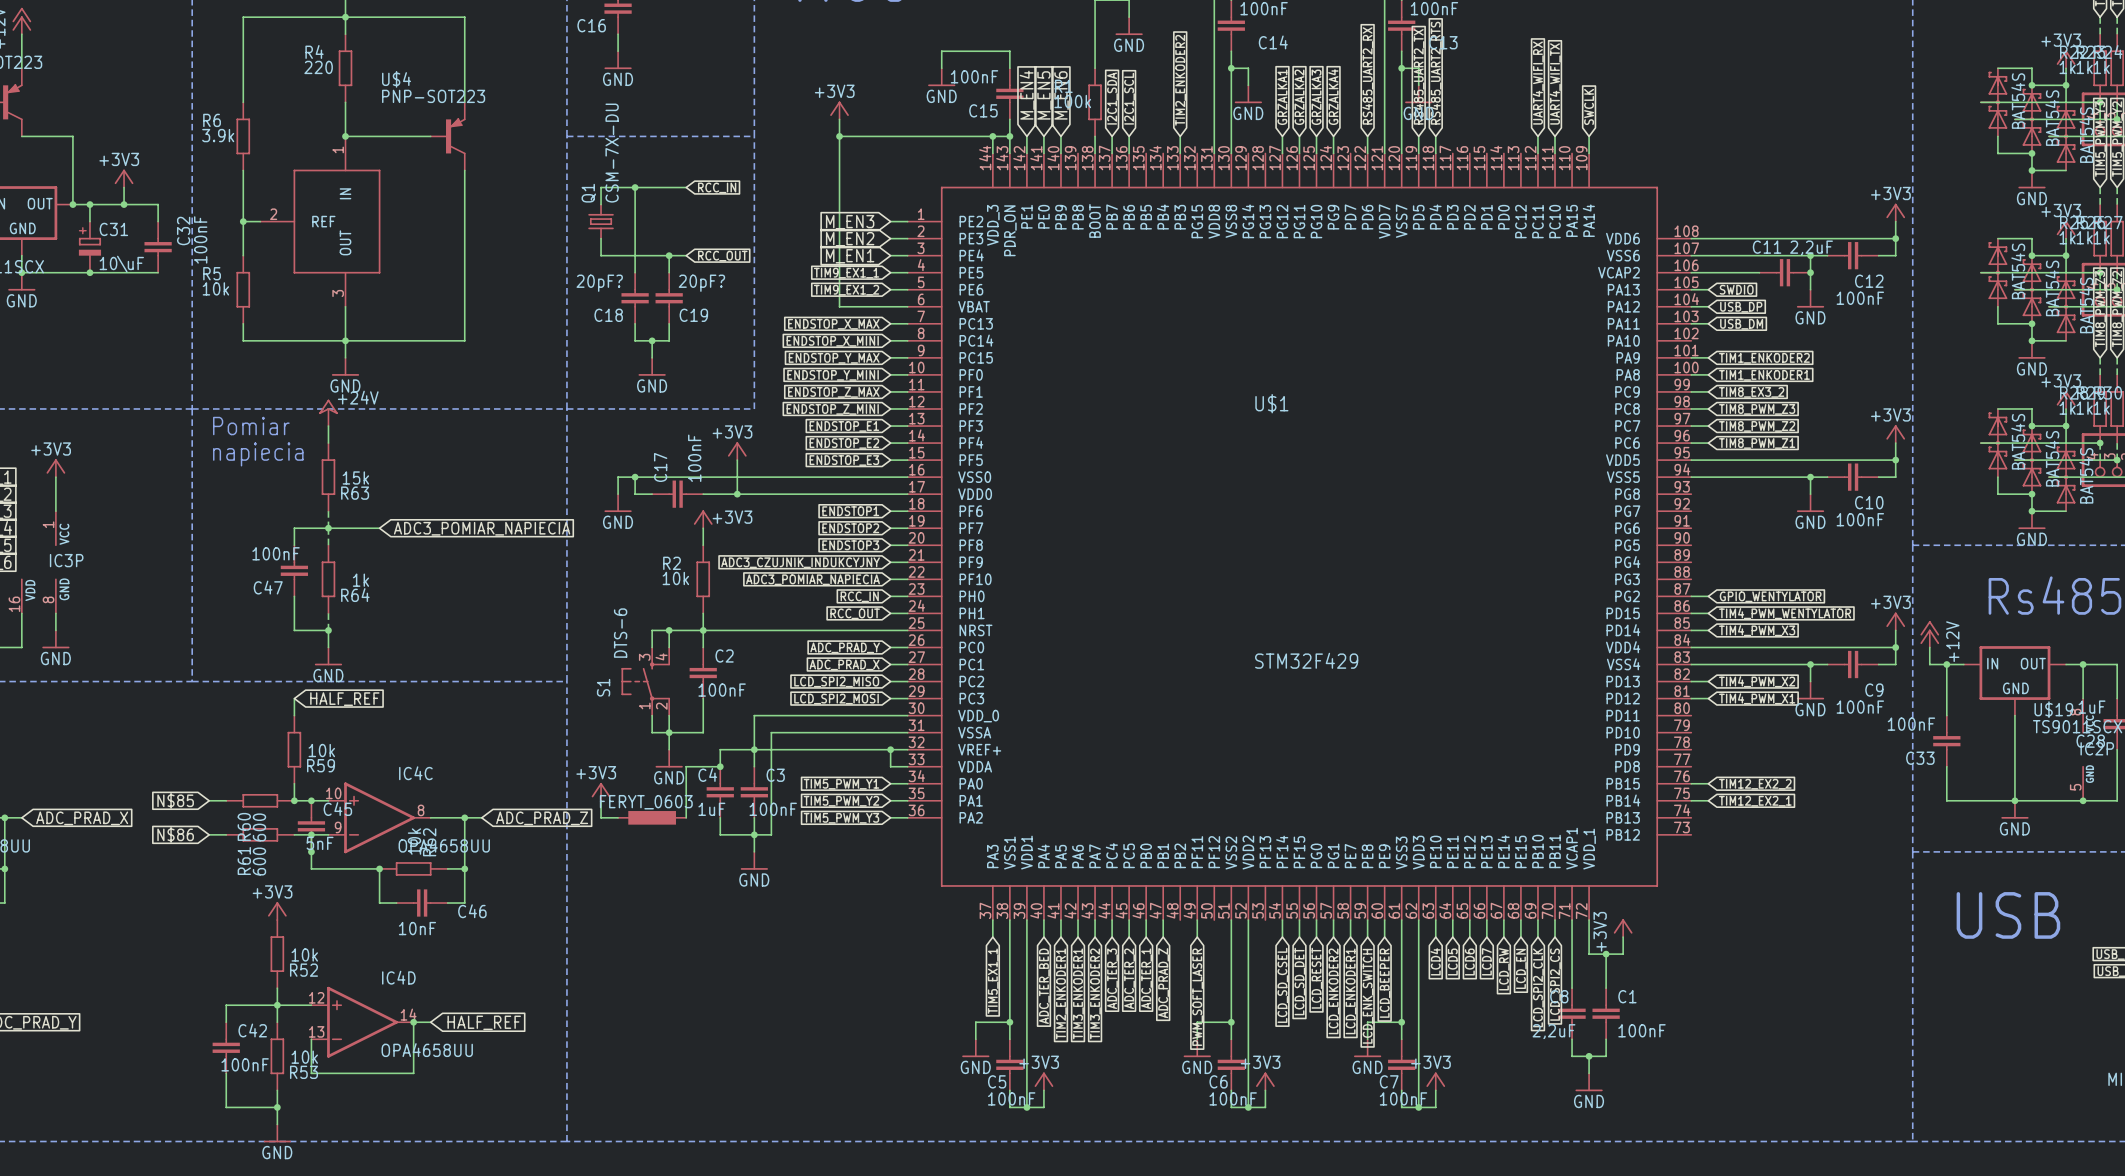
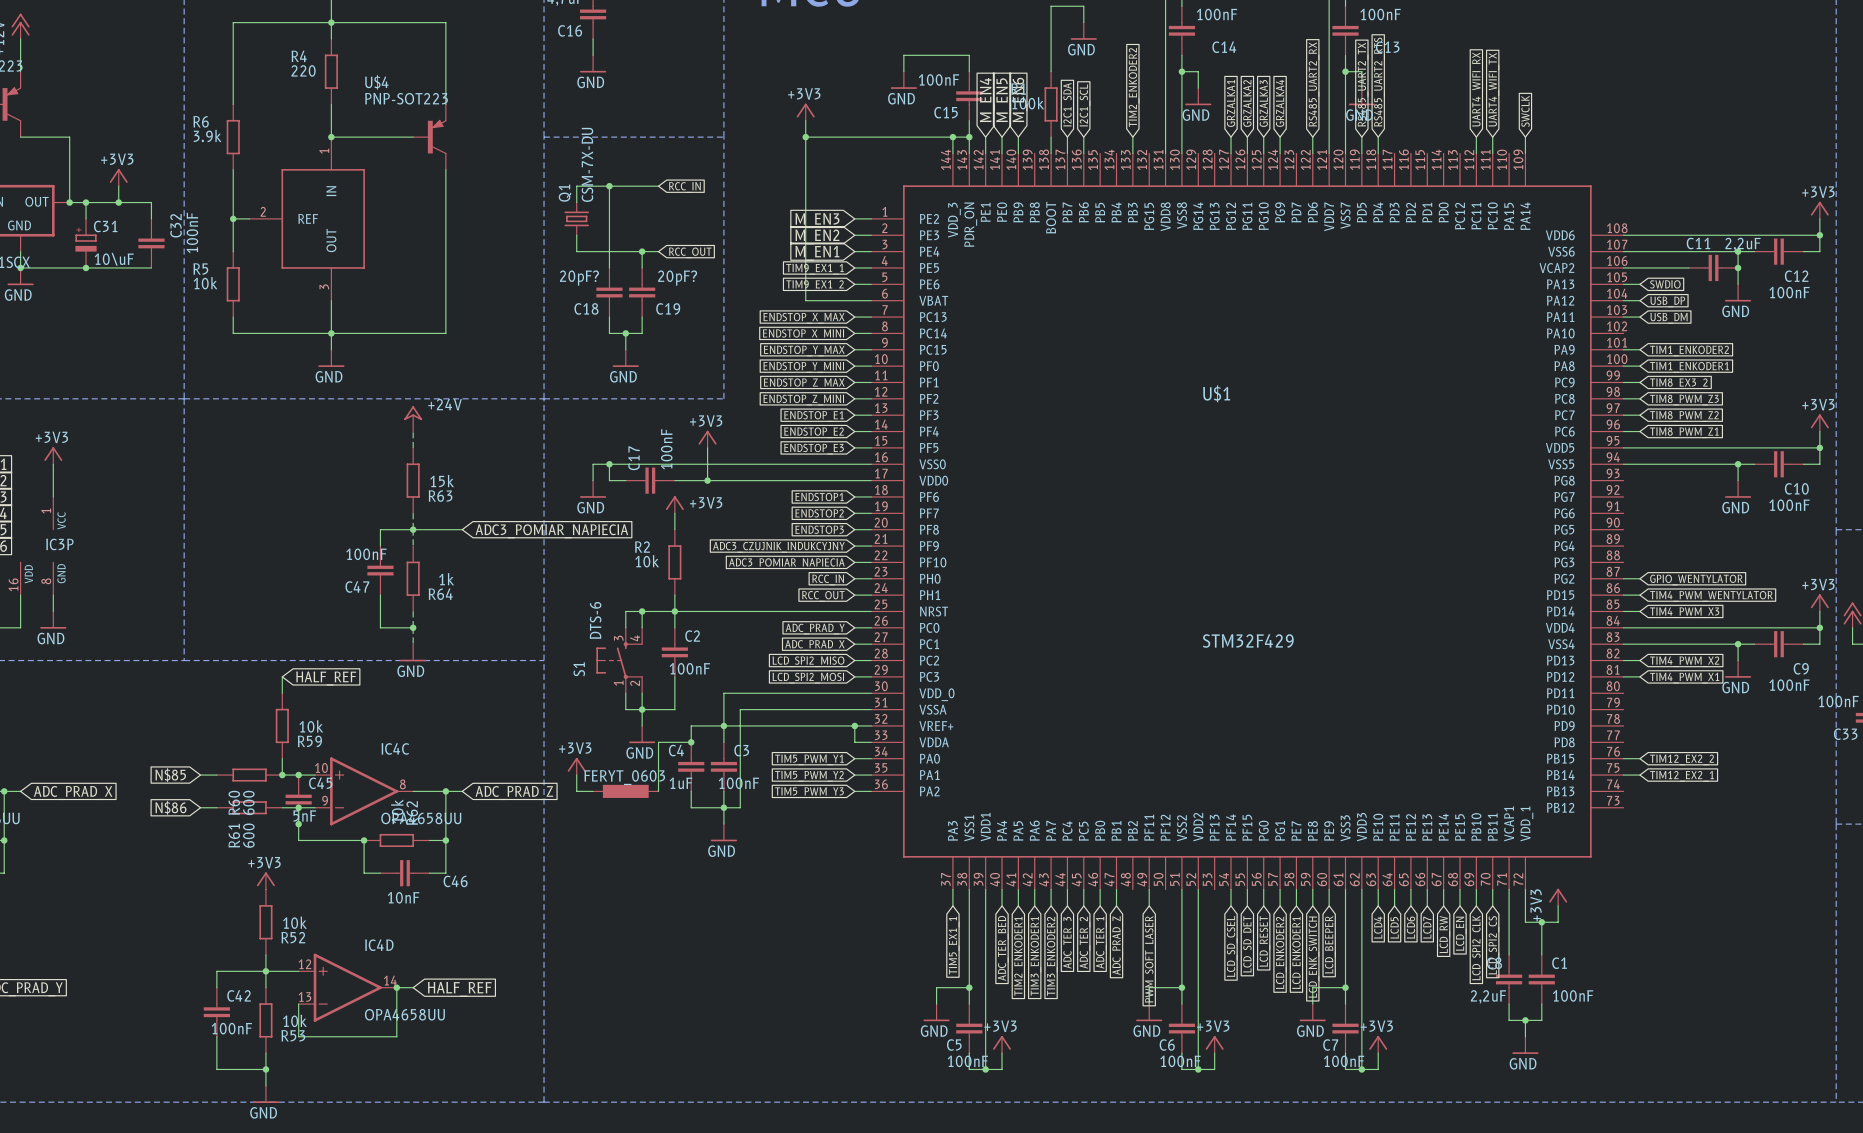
power symbol position: +24V (328, 412) -> +24V (413, 418)
text: Pomiar (251, 426) -> none
wire: (328, 426) (328, 443) -> (413, 431) (413, 447)
text: napiecia (258, 454) -> none
R63 position: (328, 477) -> (413, 480)
wire: (328, 511) (328, 545) -> (413, 513) (413, 546)
junction: (328, 528) -> none
wire: (379, 528) (294, 528) (294, 545) -> (462, 529) (380, 529) (380, 546)
global label position: ADC3_POMIAR_NAPIECIA (482, 528) -> ADC3_POMIAR_NAPIECIA (551, 531)
junction: none -> (413, 529)
C47 position: (294, 570) -> (380, 570)
R64 position: (328, 579) -> (413, 578)
wire: (294, 596) (294, 630) (328, 630) -> (380, 595) (380, 627) (413, 627)
wire: (328, 613) (328, 630) -> none
wire: (328, 630) (328, 647) -> none
junction: (328, 630) -> none
wire: none -> (413, 611) (413, 644)
junction: none -> (413, 627)
power symbol position: GND (328, 656) -> GND (413, 652)

